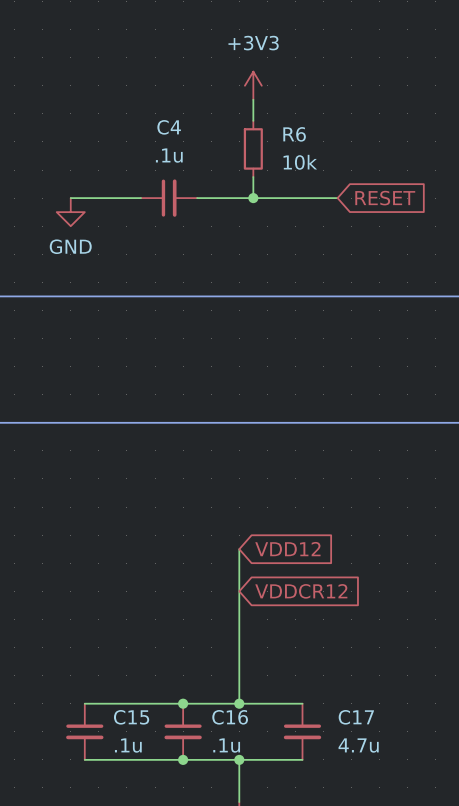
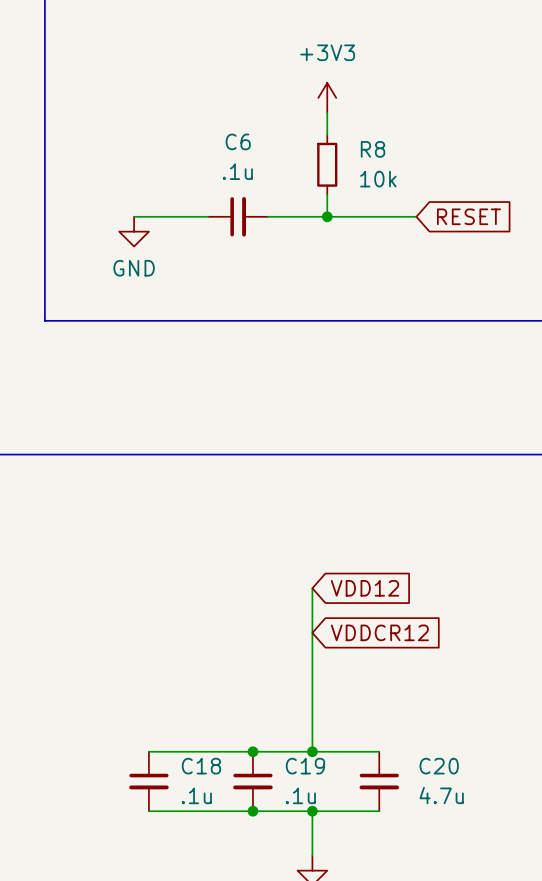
C4 name: C4 (169, 127) -> C6 (238, 141)
R6 name: R6 (294, 134) -> R8 (373, 149)
C15 name: C15 (131, 717) -> C18 (201, 766)
C16 name: C16 (230, 717) -> C19 (305, 766)
C17 name: C17 (356, 717) -> C20 (439, 766)

